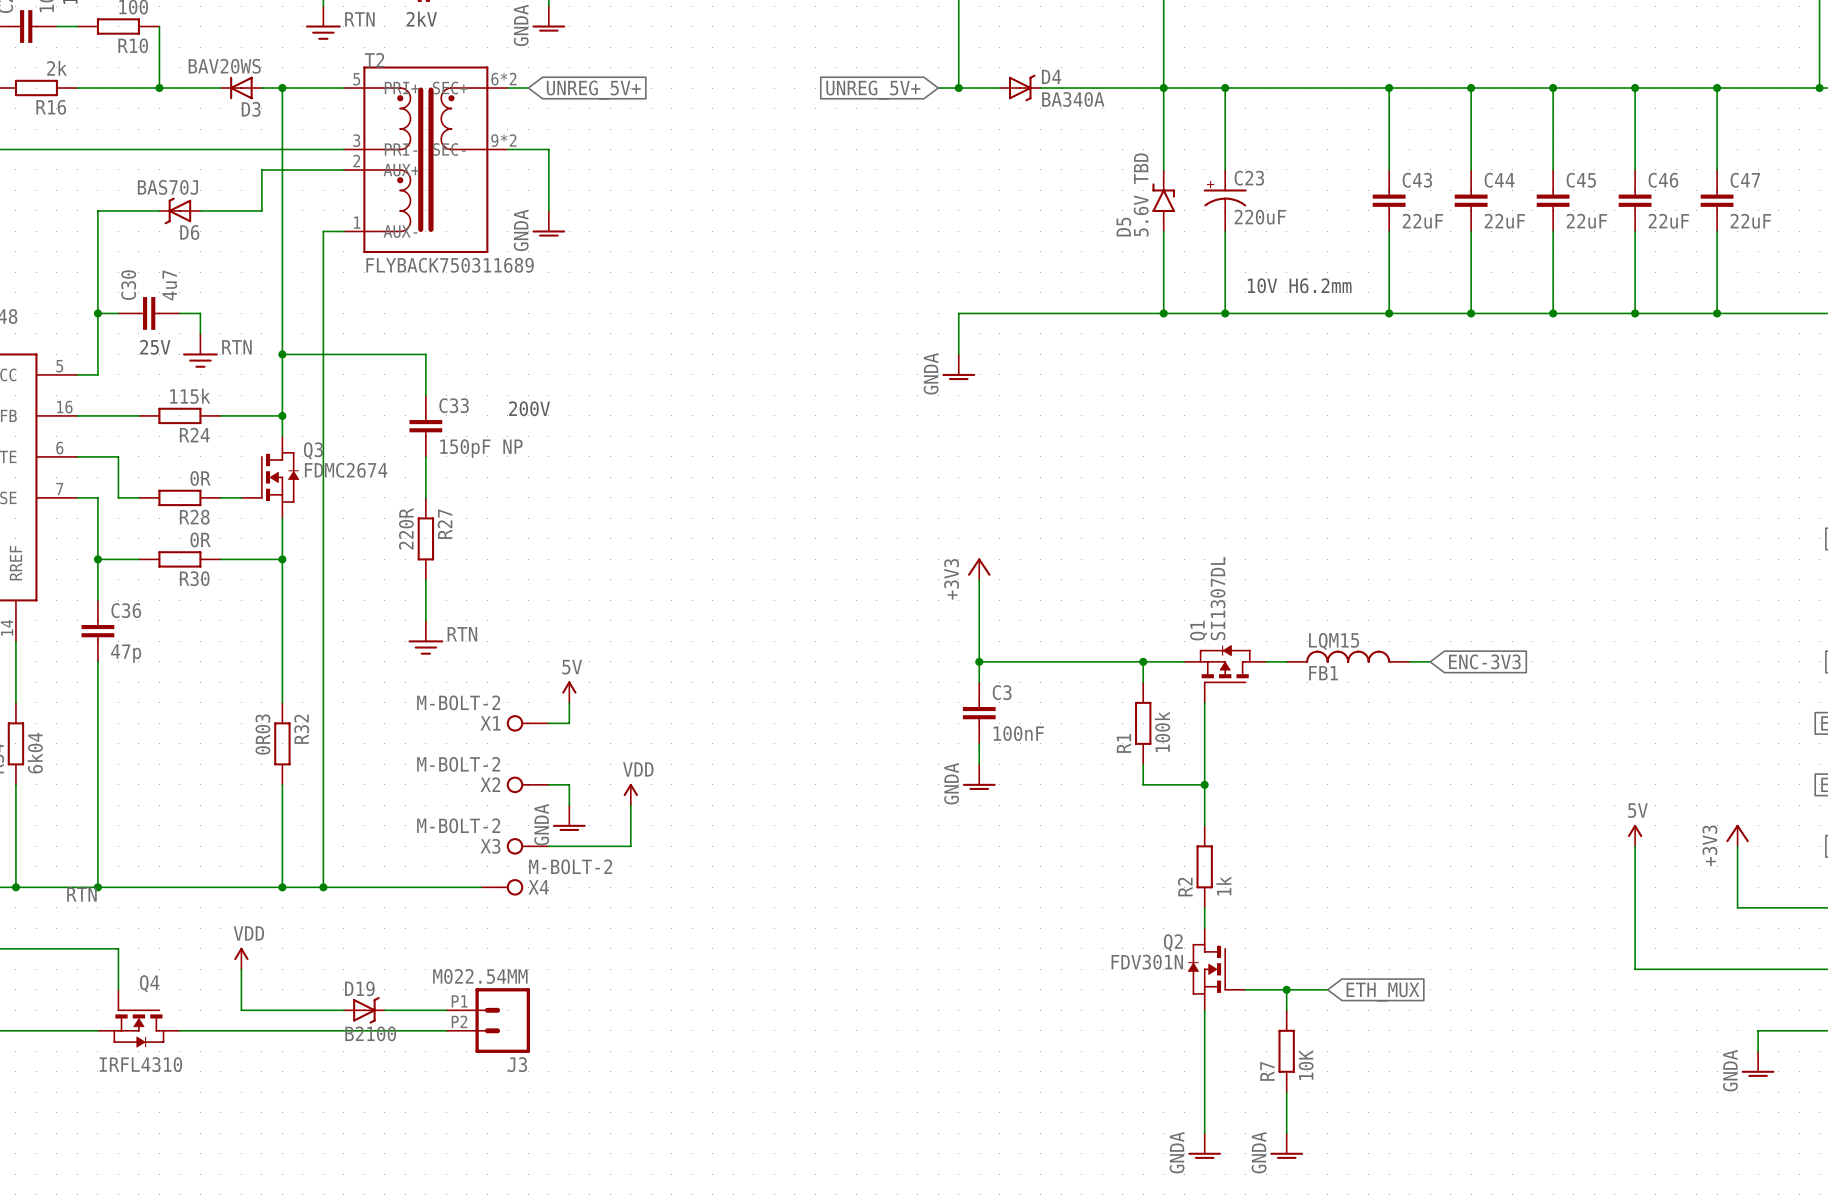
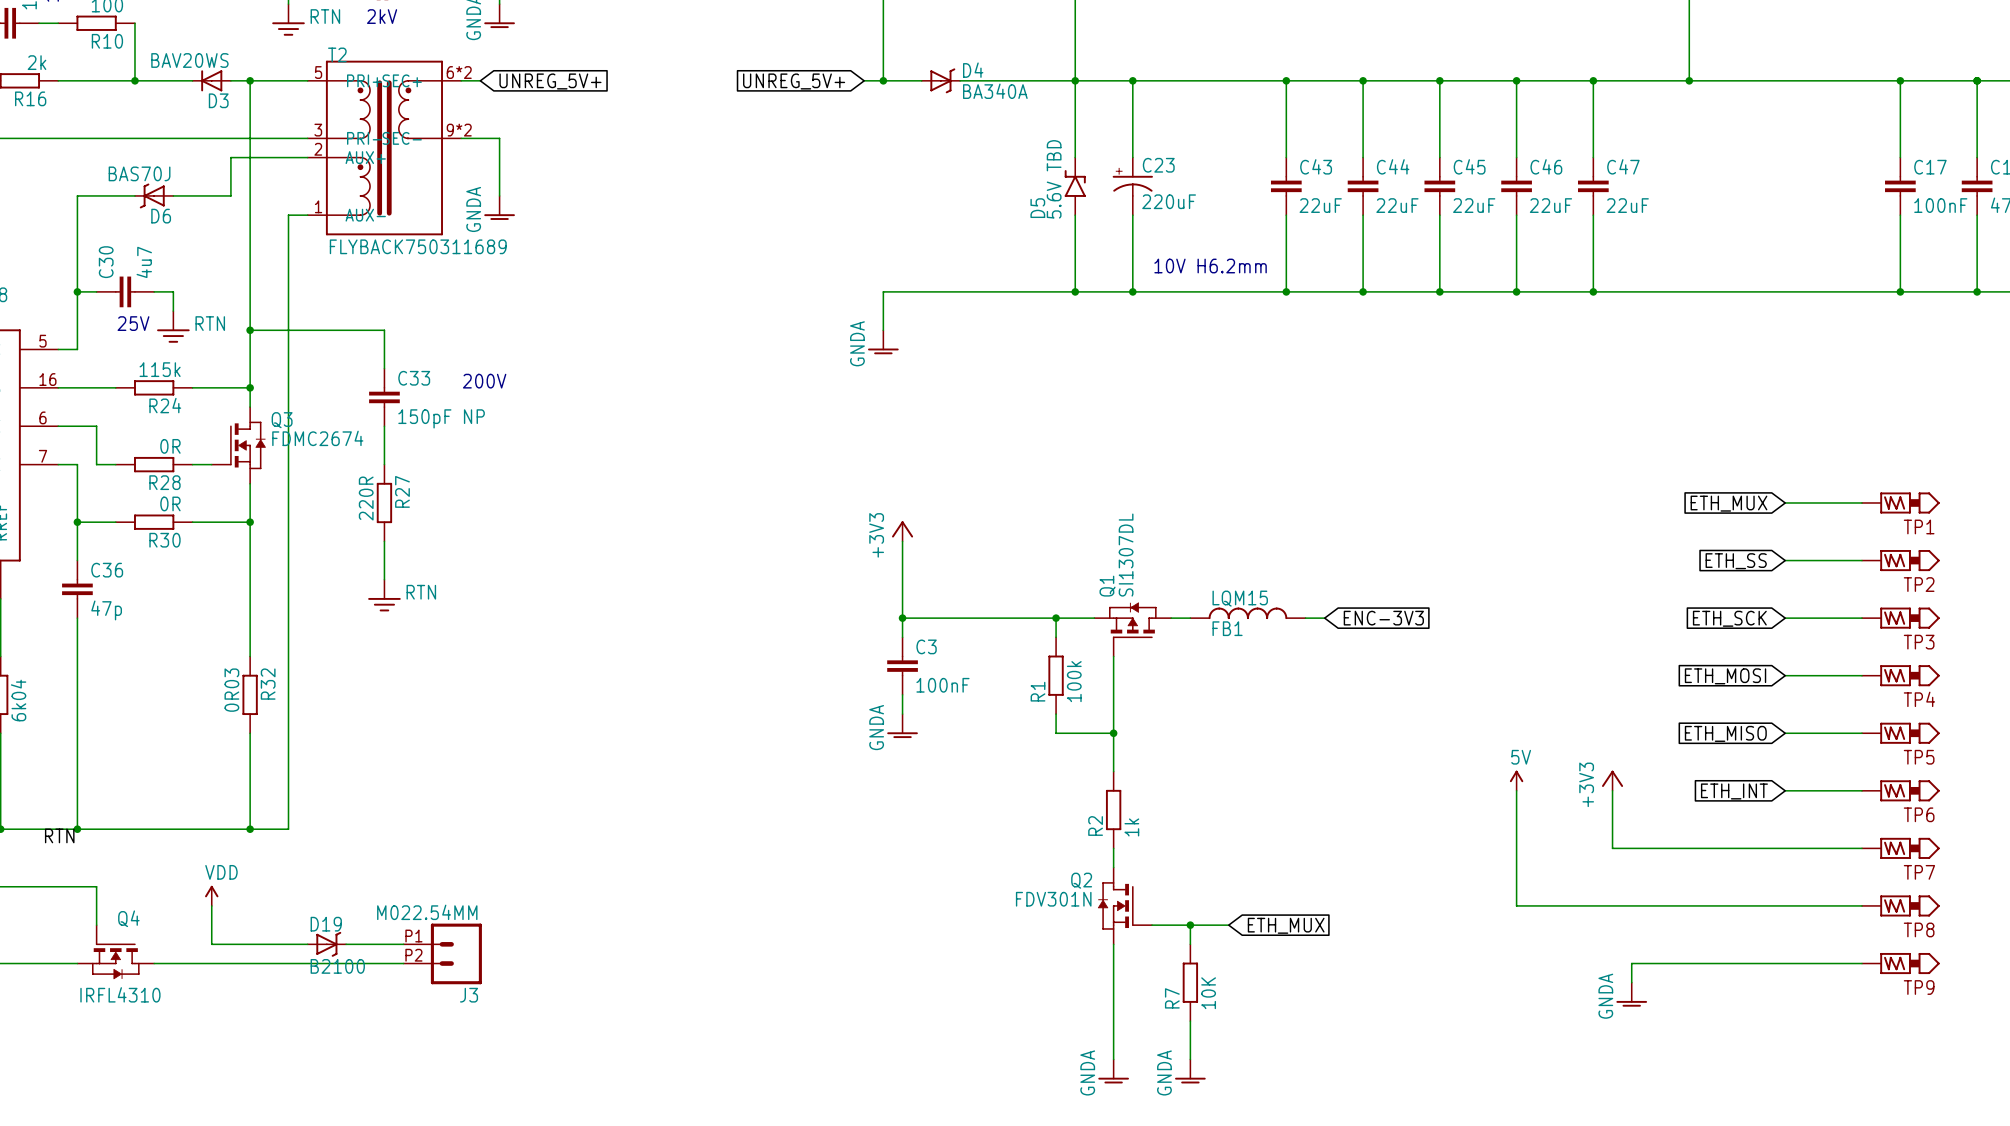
power symbol: 5V (569, 692) -> none
wire: (569, 702) (569, 723) (548, 723) -> none
X1: M-BOLT-2 (527, 723) -> none
X2: M-BOLT-2 (527, 784) -> none
wire: (548, 784) (569, 784) (569, 805) -> none
power symbol: VDD (630, 794) -> none
wire: (630, 805) (630, 846) (548, 846) -> none
power symbol: GNDA (569, 818) -> none
X3: M-BOLT-2 (527, 846) -> none
wire: (323, 887) (481, 887) -> none
junction: (323, 887) -> none
X4: M-BOLT-2 (502, 887) -> none

